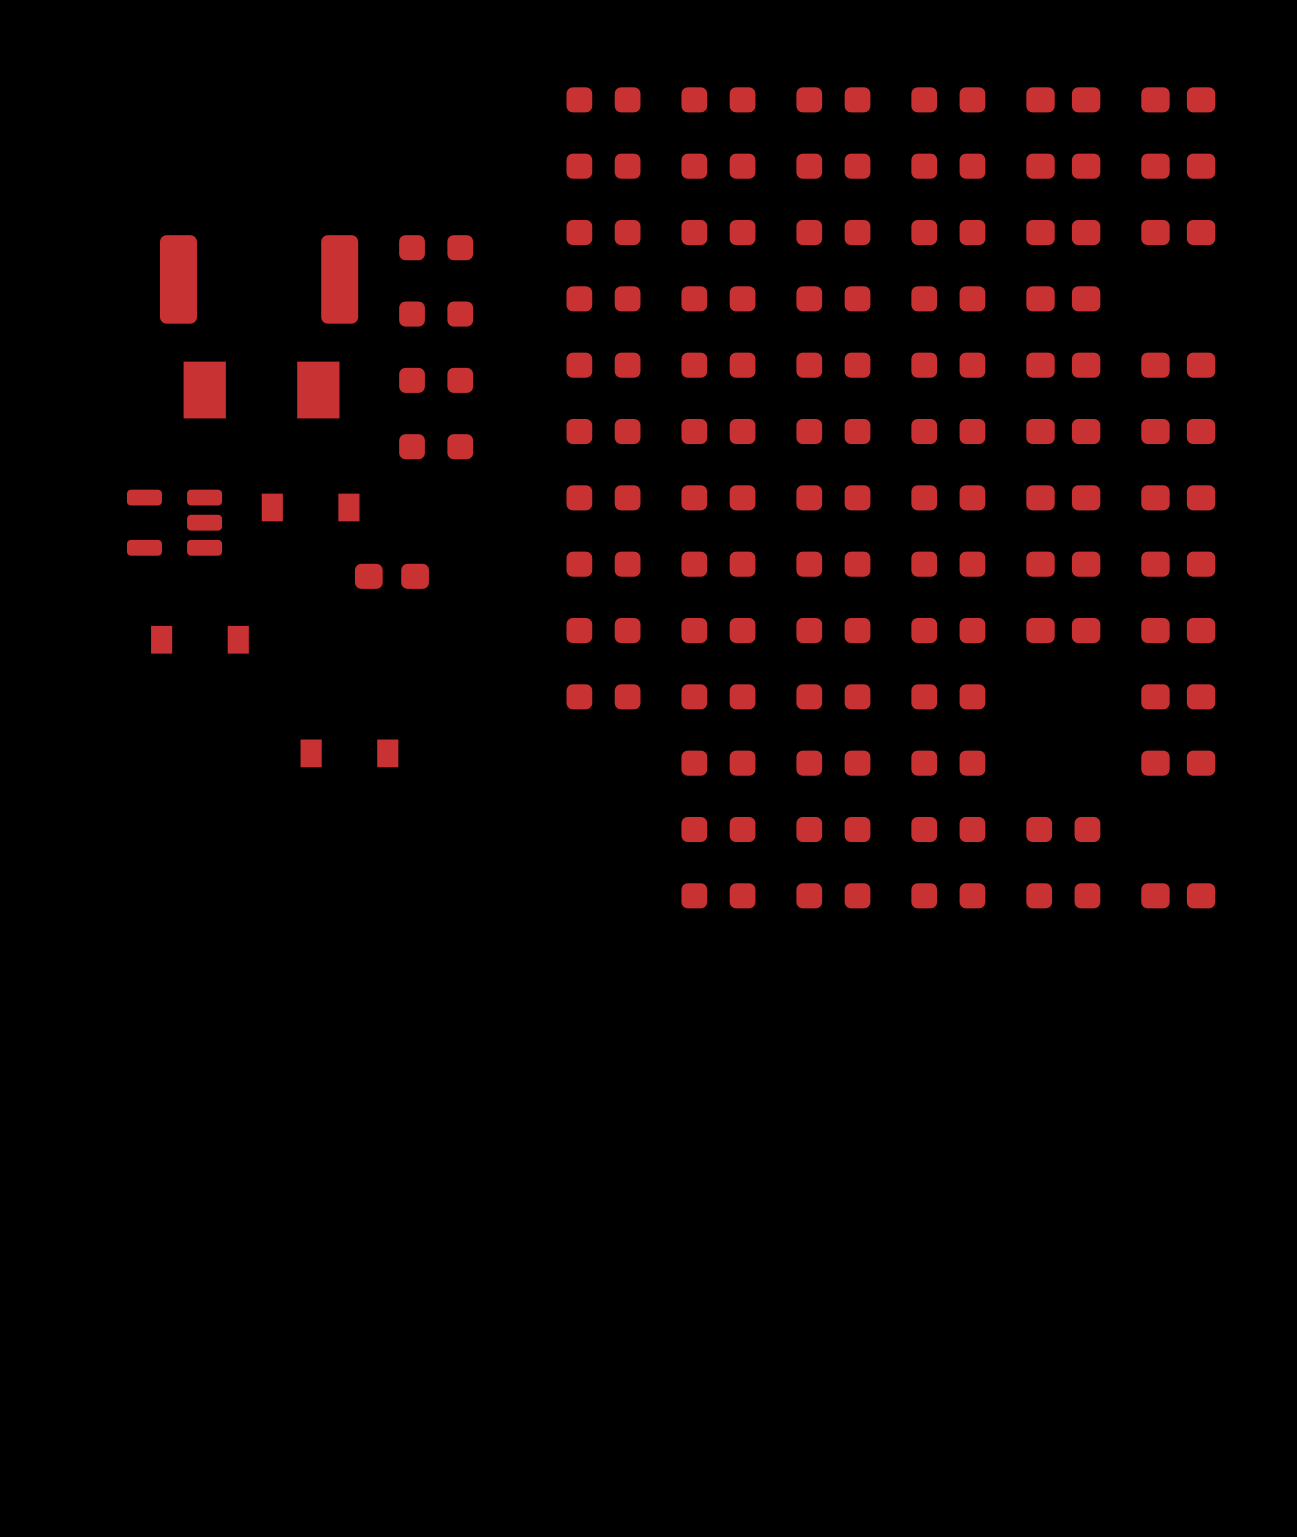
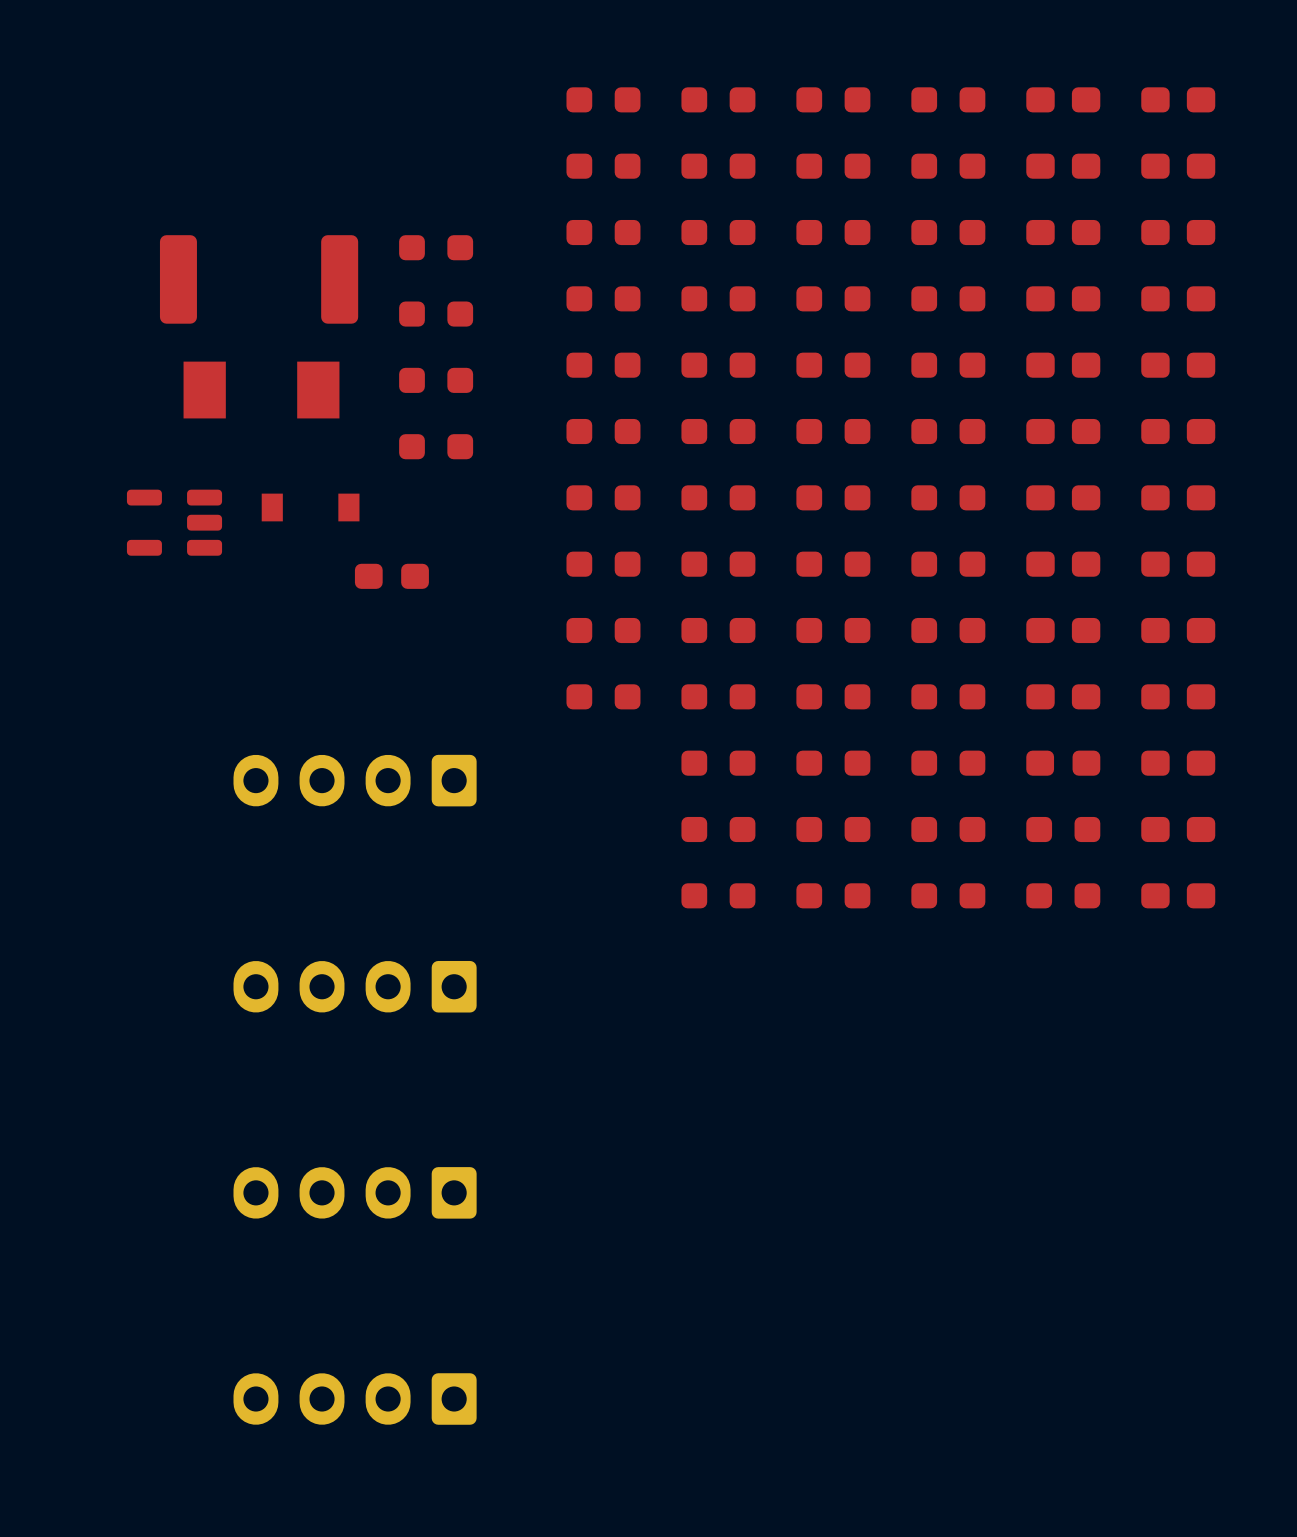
part: none -> (1178, 298)
part: (199, 639) -> none
part: none -> (1063, 696)
part: (349, 753) -> none
part: none -> (1063, 763)
part: none -> (355, 780)
part: none -> (1178, 829)
part: none -> (355, 986)
part: none -> (355, 1192)
part: none -> (355, 1399)

